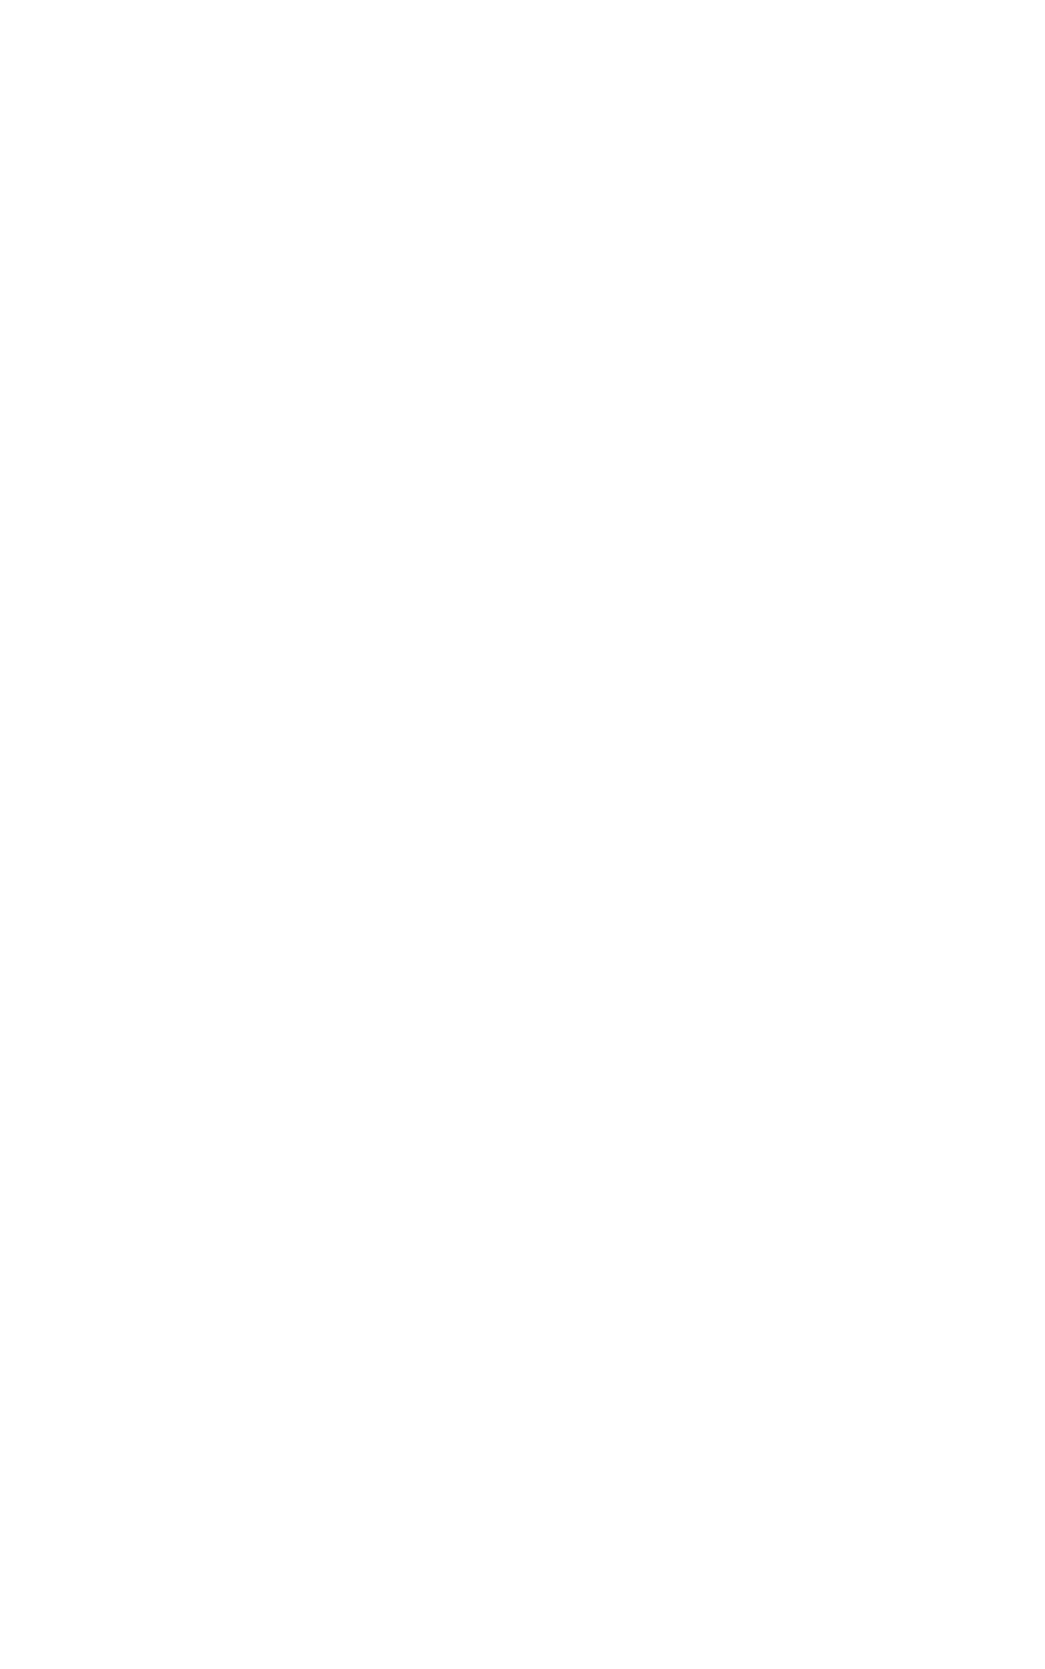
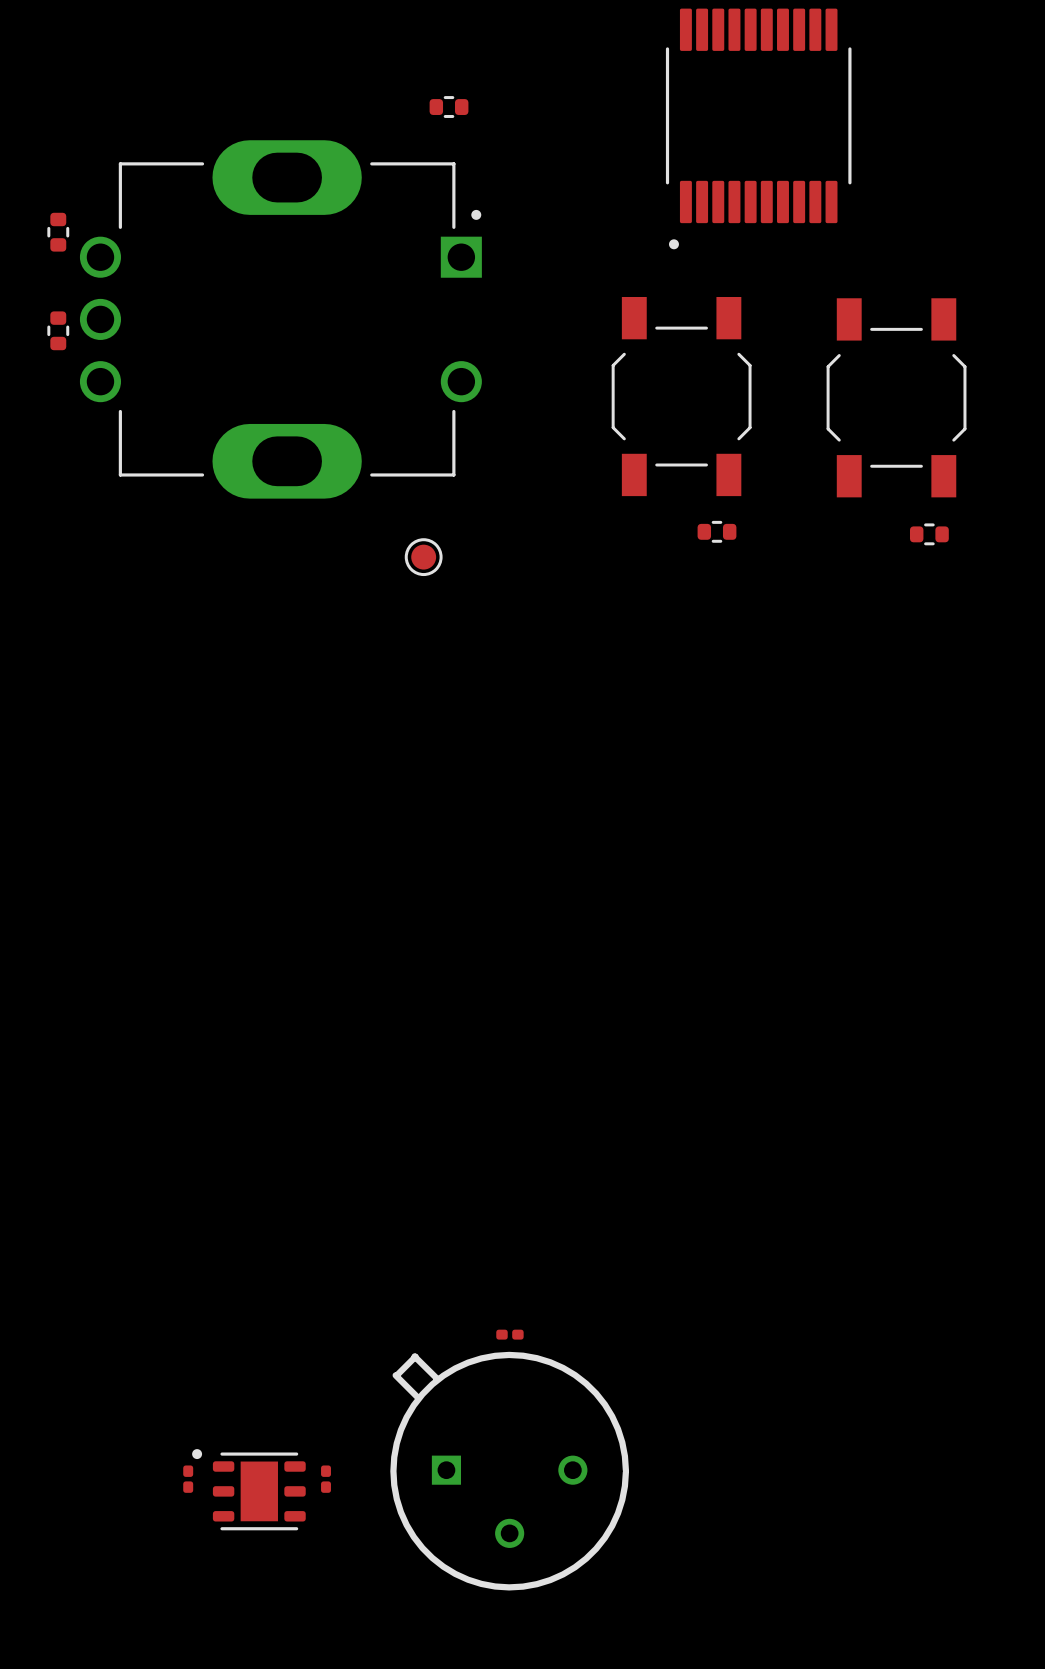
part: none -> (449, 107)
part: none -> (758, 128)
part: none -> (58, 232)
part: none -> (280, 319)
part: none -> (58, 330)
part: none -> (681, 396)
part: none -> (896, 397)
part: none -> (716, 531)
part: none -> (929, 534)
part: none -> (423, 557)
part: none -> (509, 1334)
part: none -> (509, 1471)
part: none -> (188, 1479)
part: none -> (326, 1479)
part: none -> (248, 1489)

